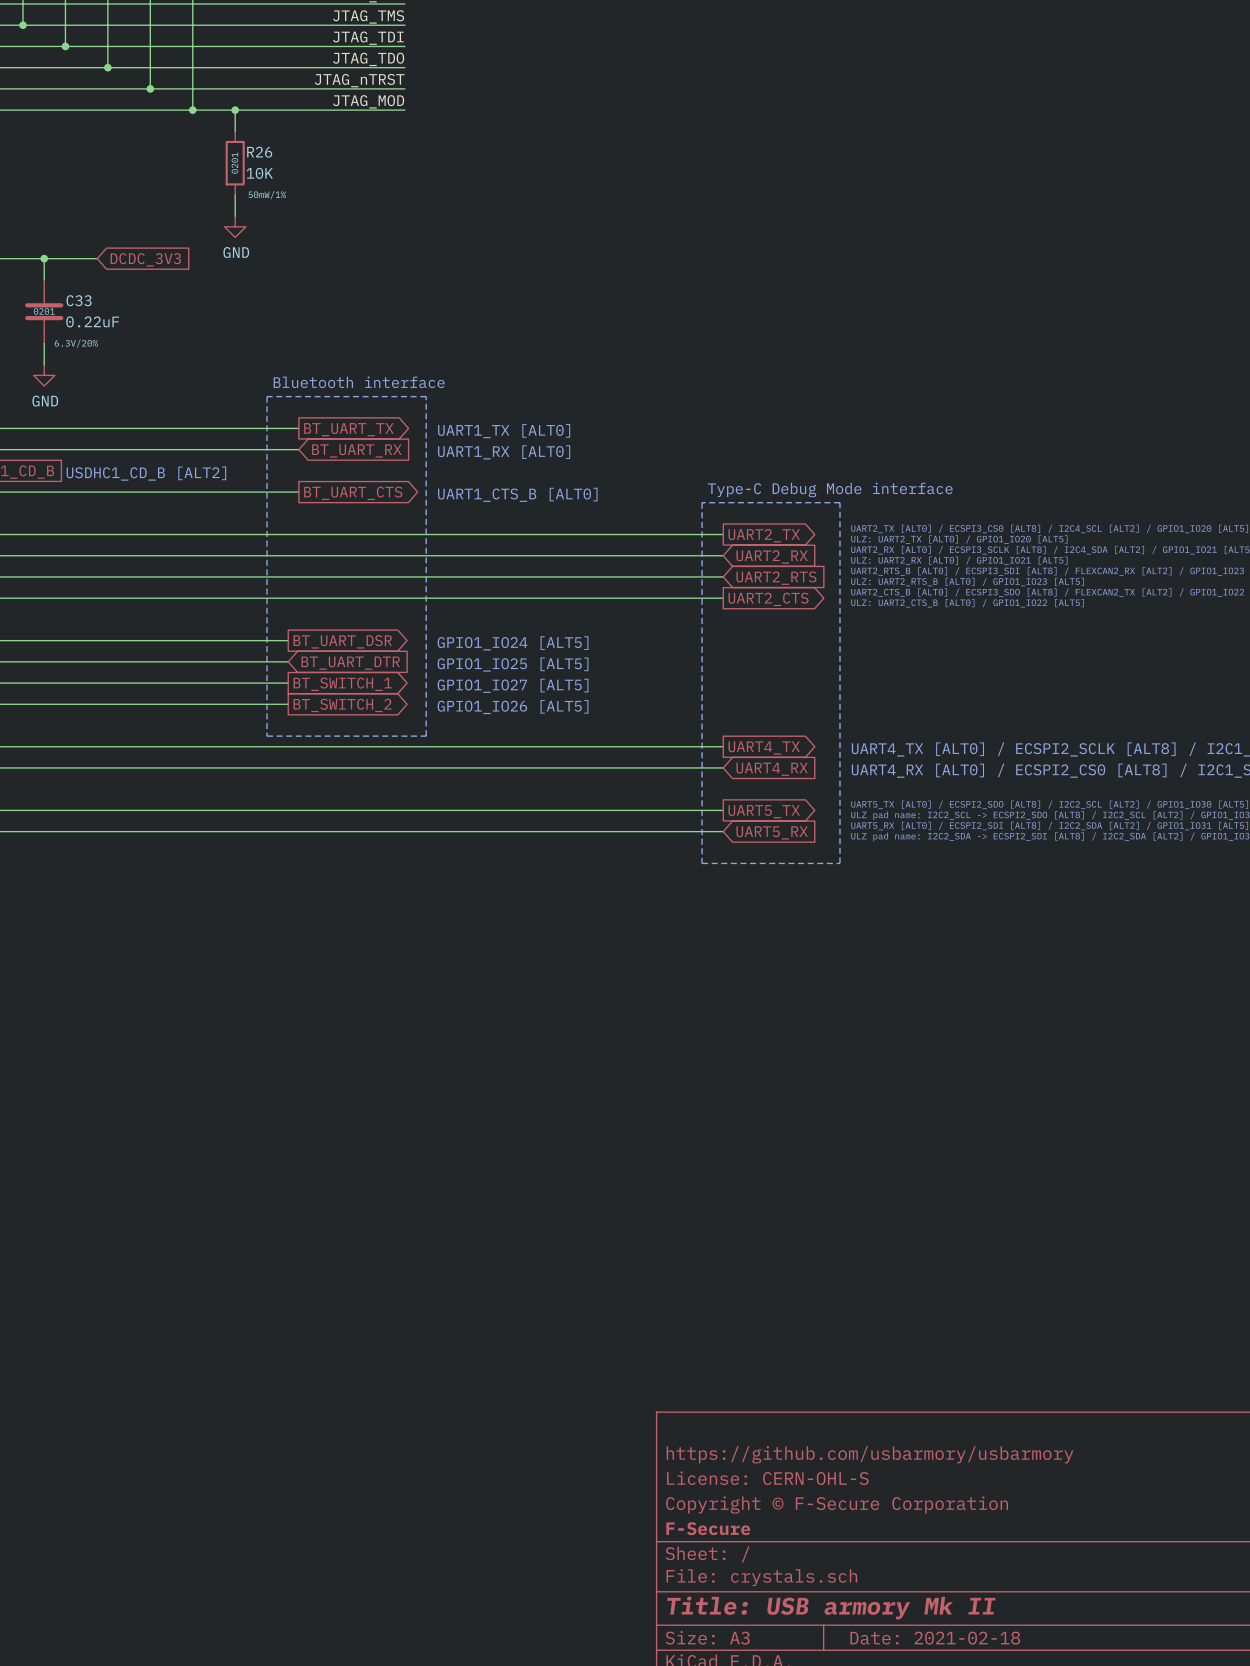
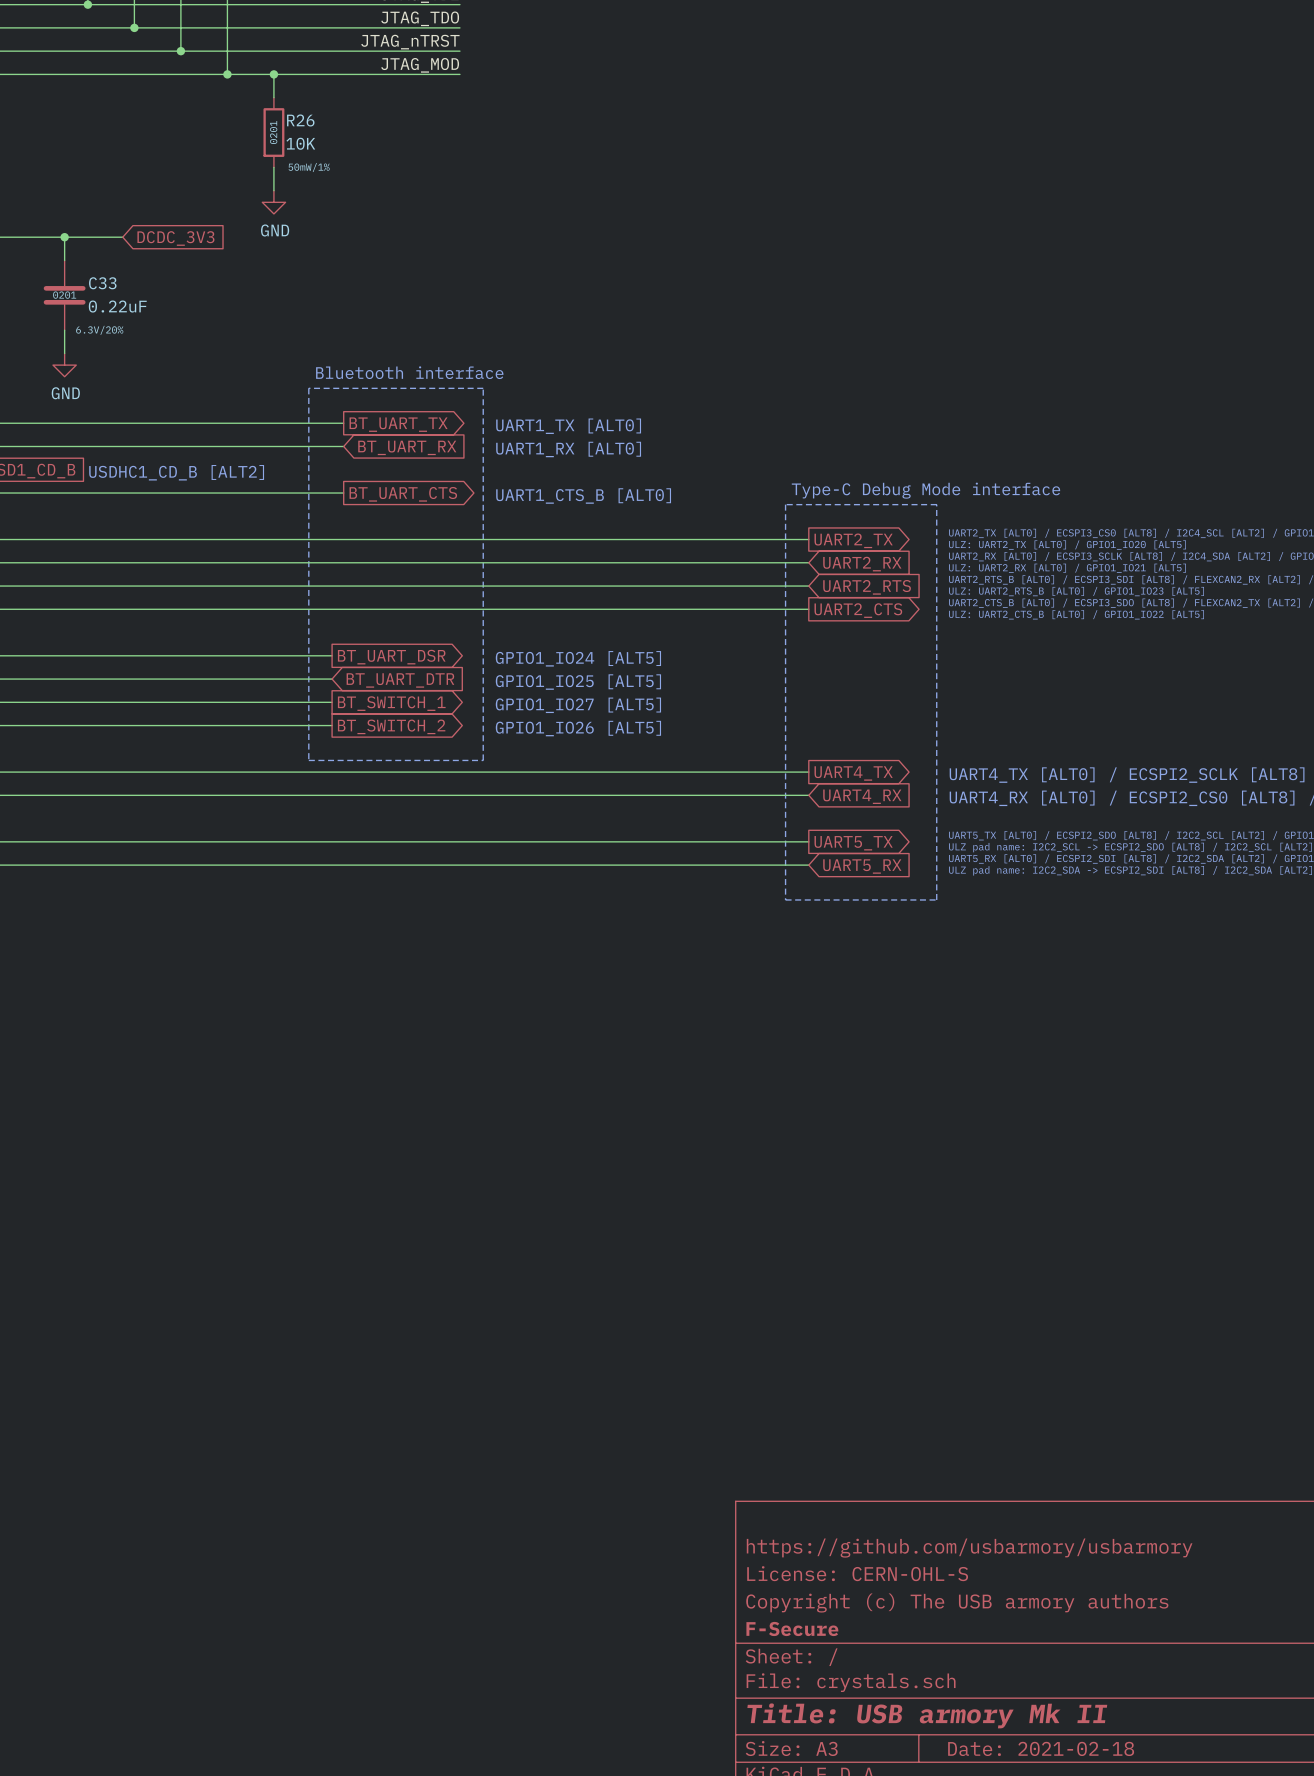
title block: Copyright © F-Secure Corporation (837, 1505) -> Copyright (c) The USB armory authors (957, 1602)

